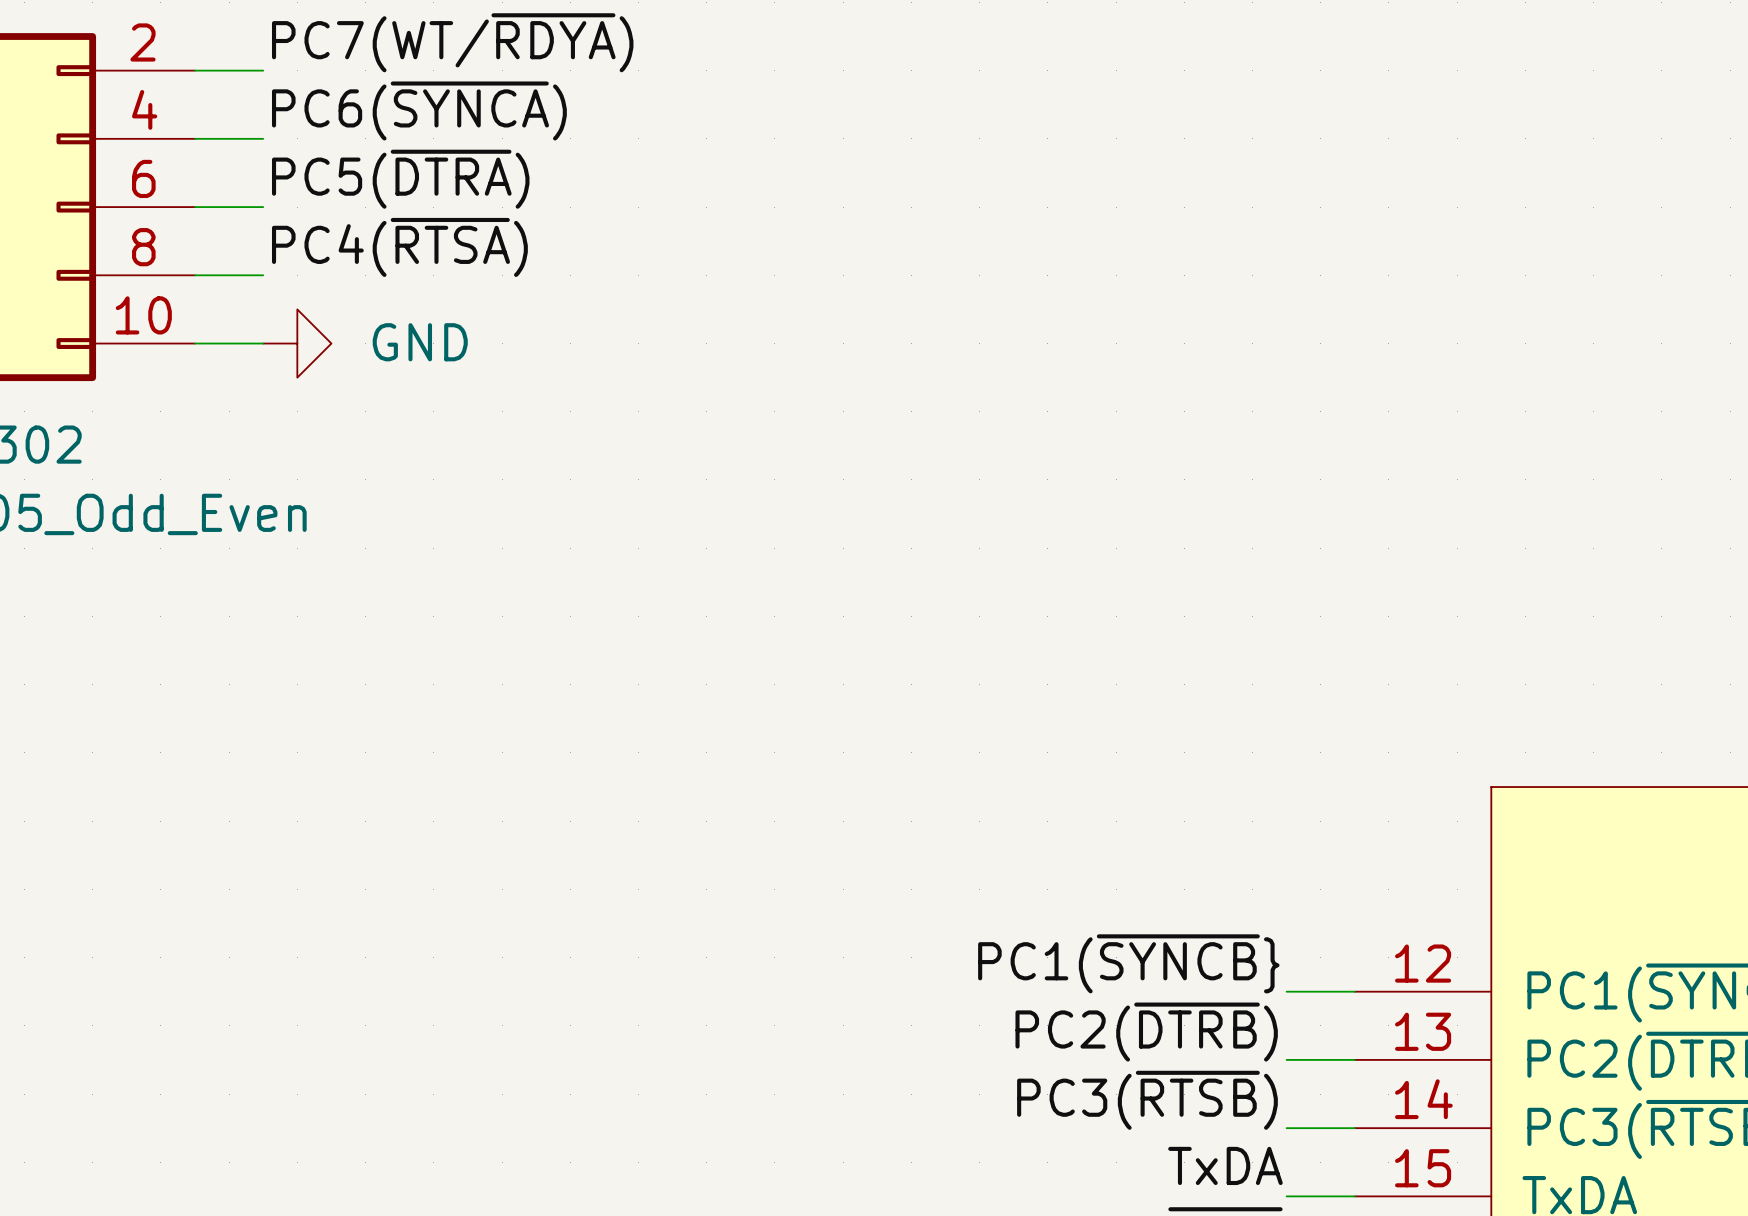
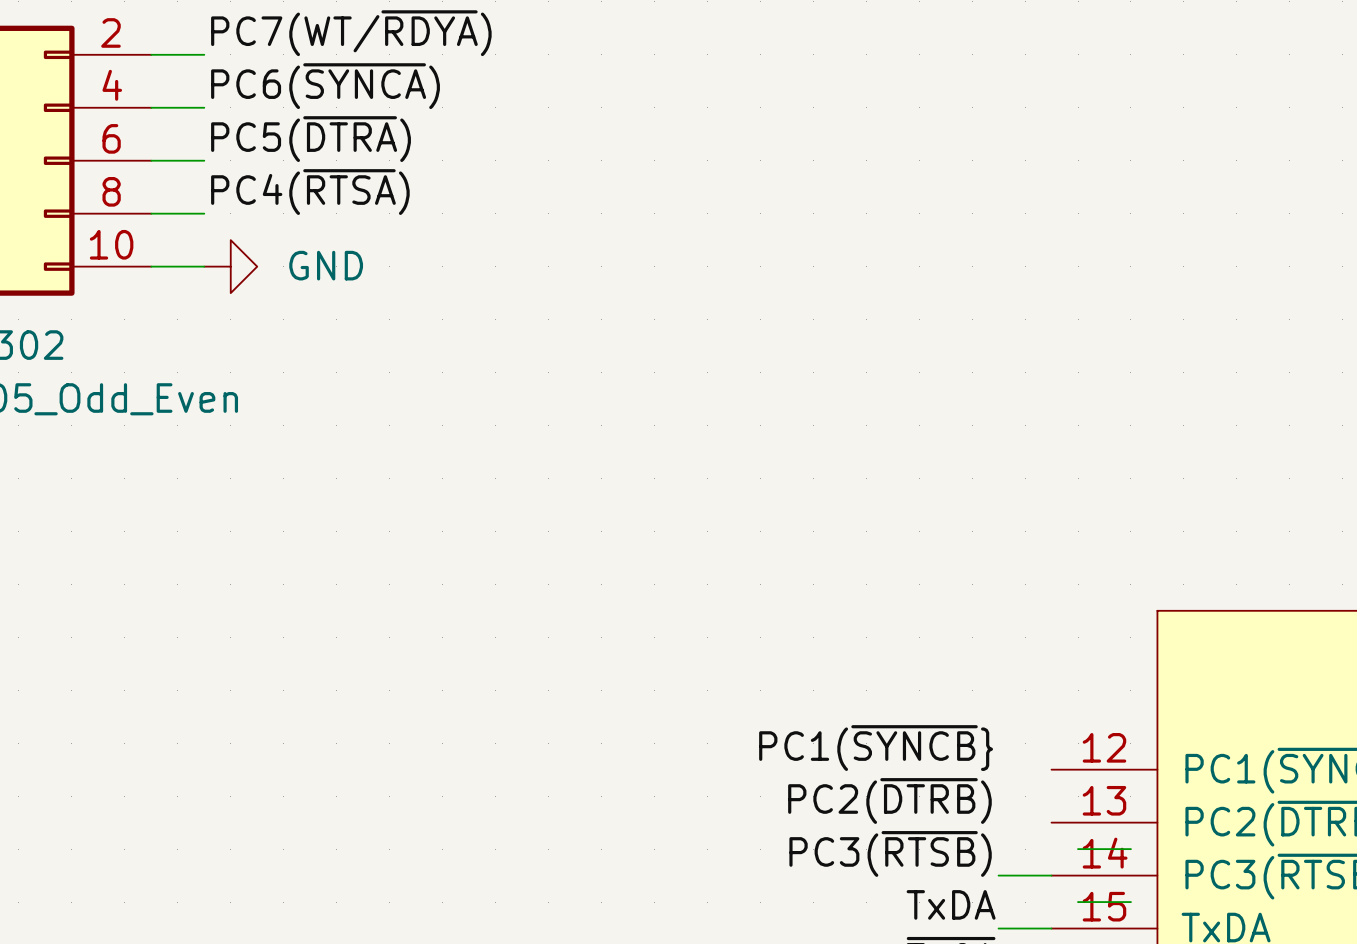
wire: (1286, 991) (1354, 991) -> (1078, 849) (1130, 849)
wire: (1286, 1059) (1354, 1059) -> (1078, 902) (1130, 902)

